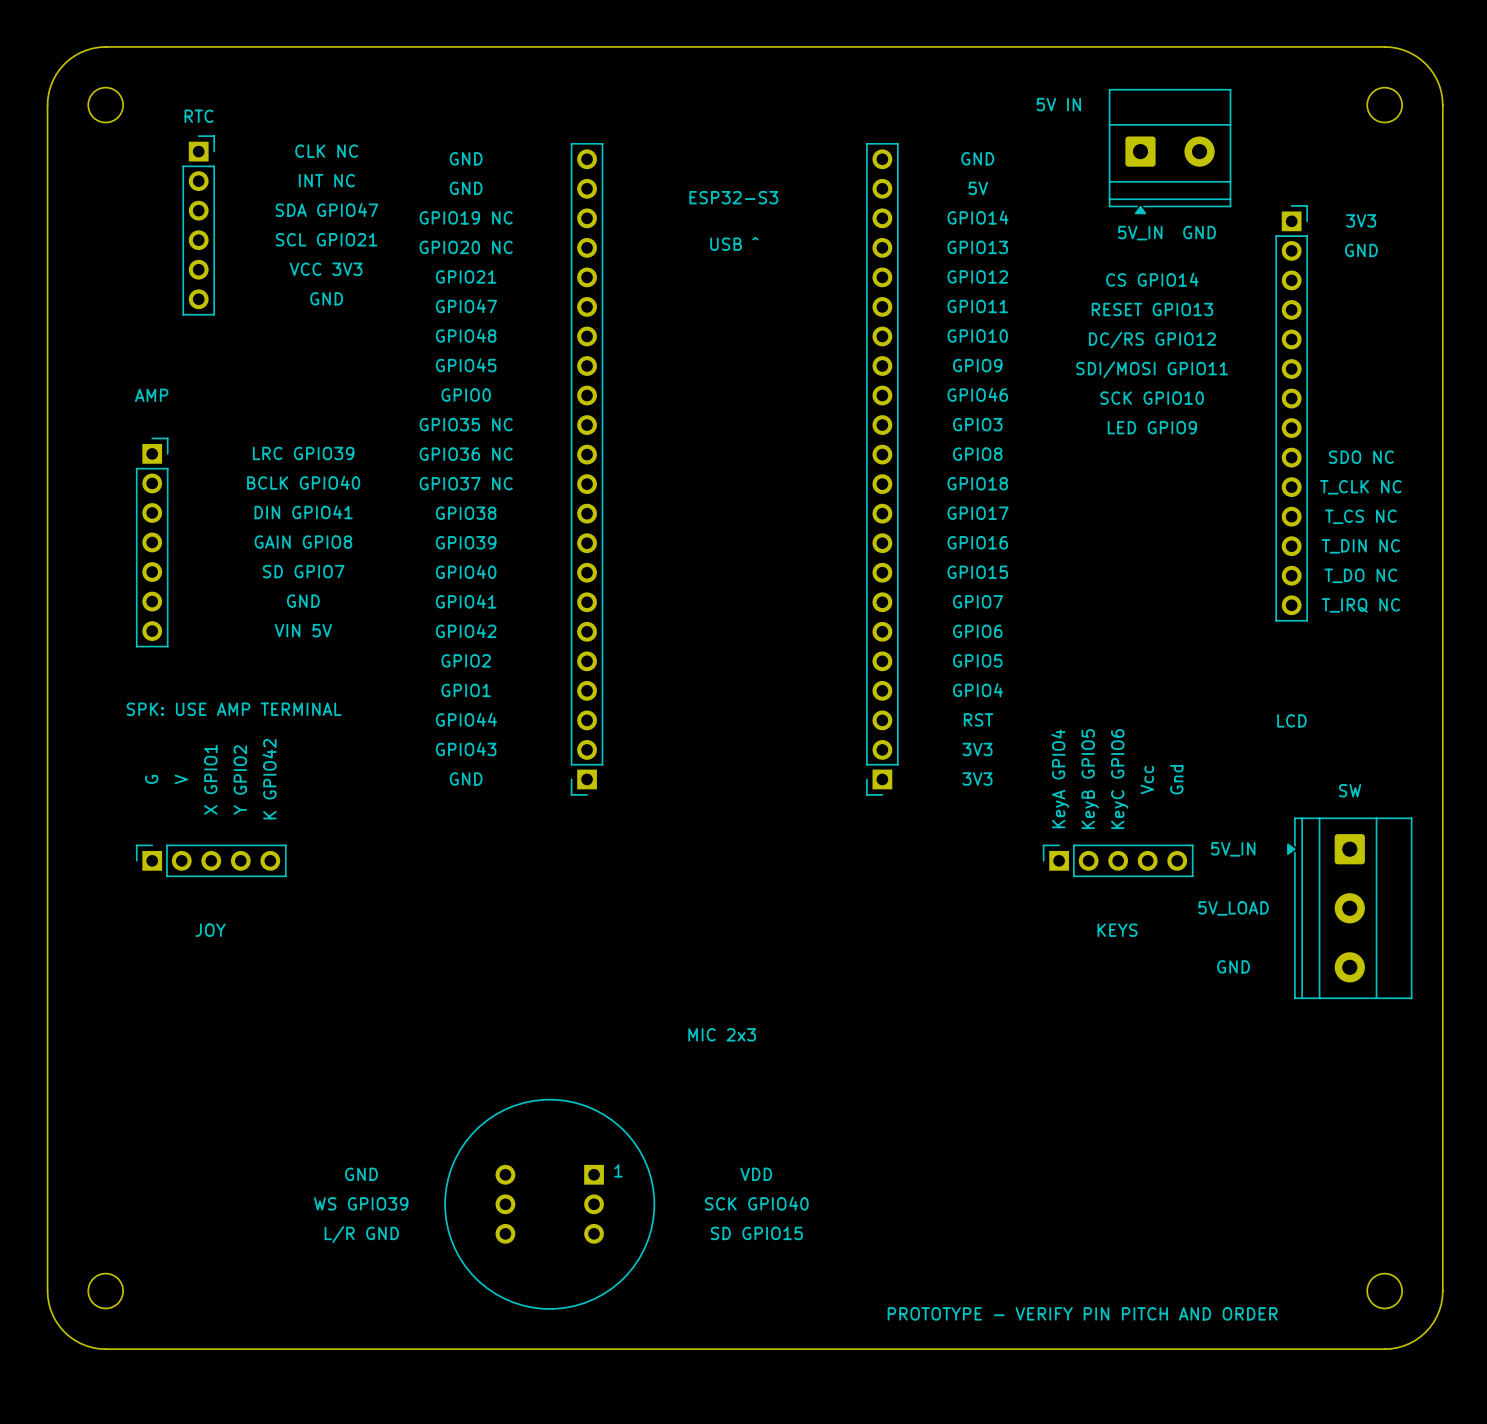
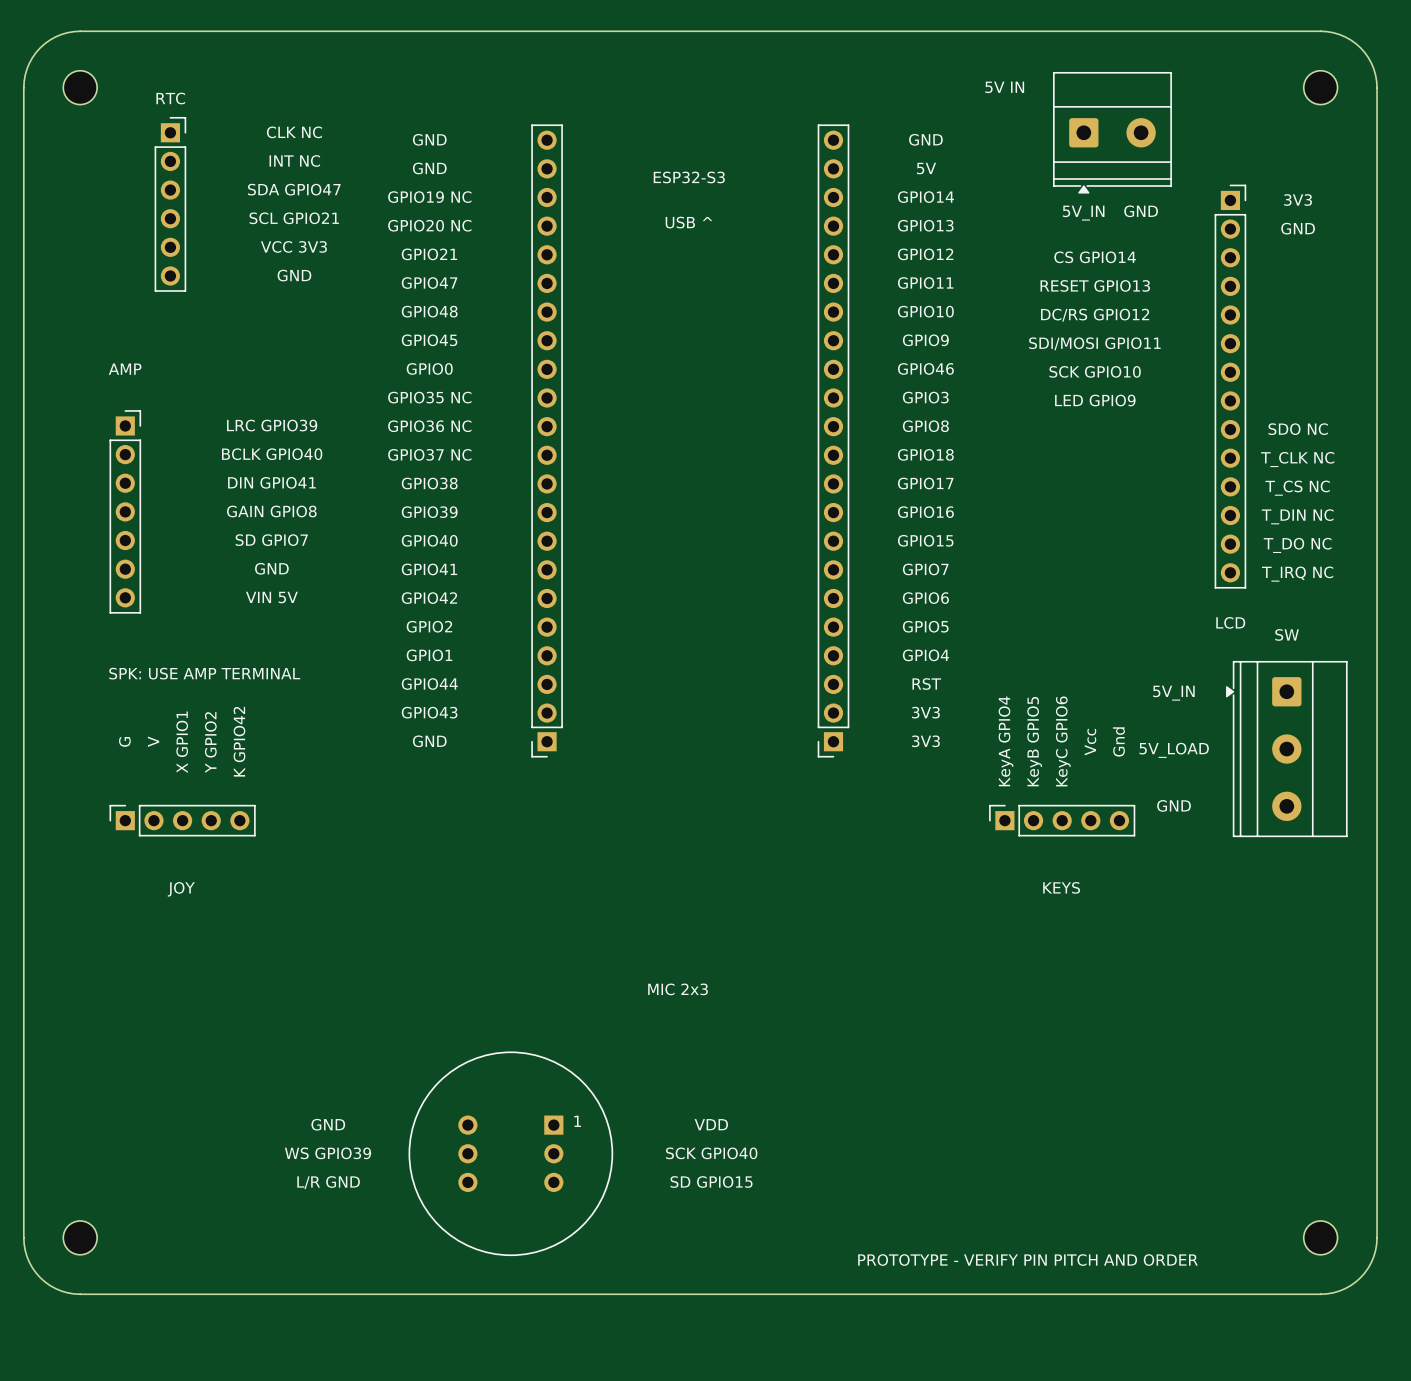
text position: LCD (1291, 720) -> LCD (1230, 622)
text: none -> 5V_IN (1173, 693)
text position: SW (1350, 790) -> SW (1287, 634)
text: 5V_IN (1233, 849) -> GND (1174, 805)
text position: 5V_LOAD (1233, 908) -> 5V_LOAD (1174, 750)
part position: (1349, 908) -> (1286, 749)
text: GND (1233, 966) -> none

